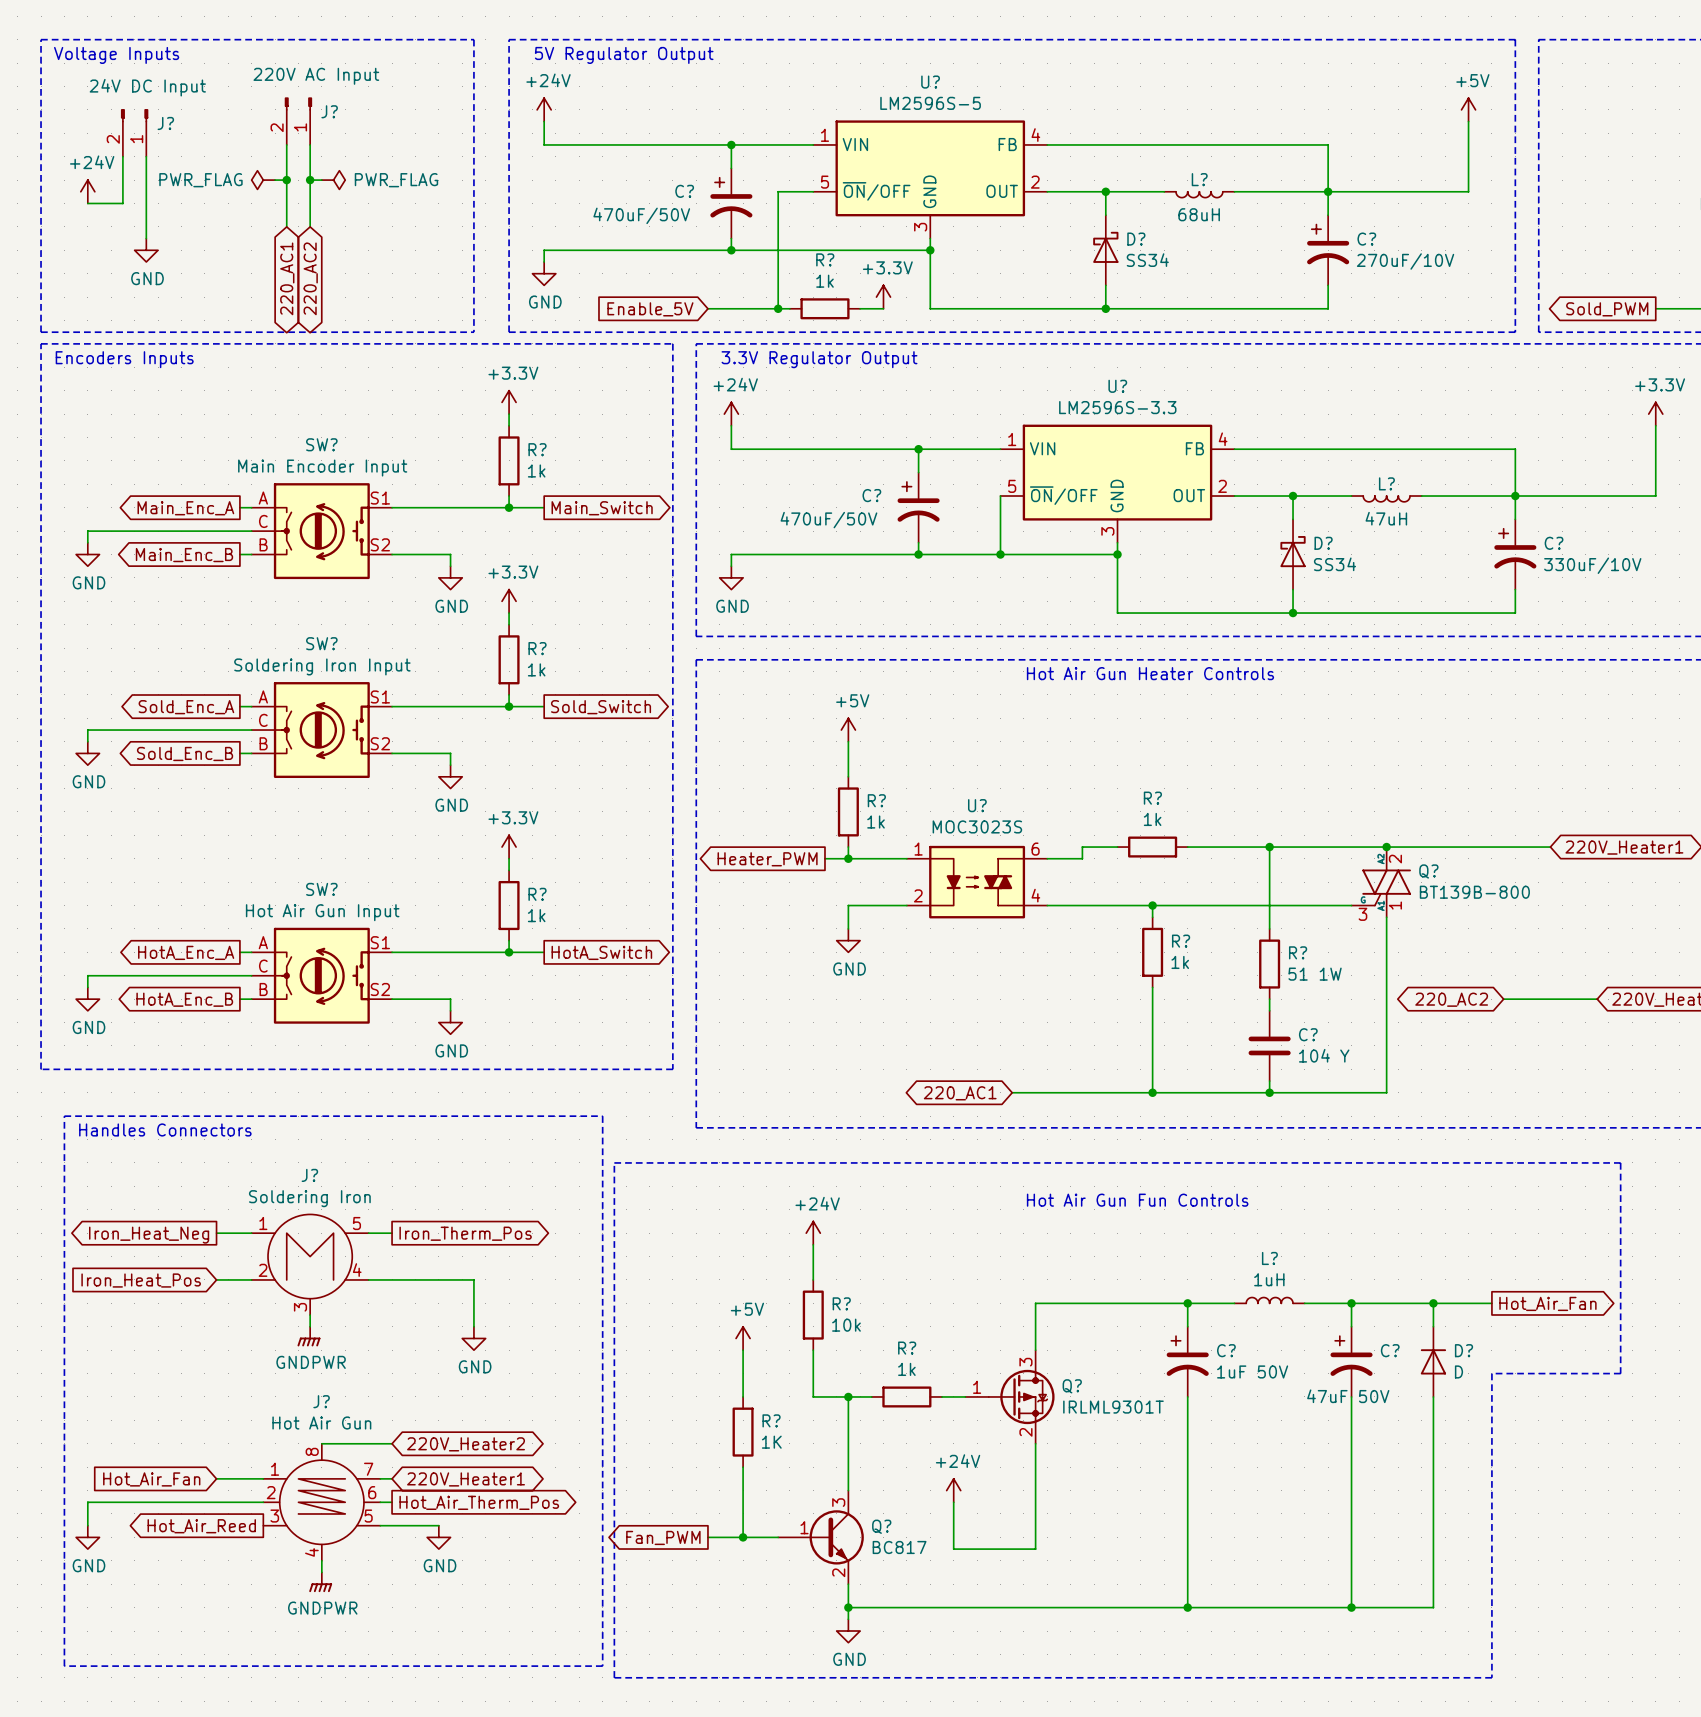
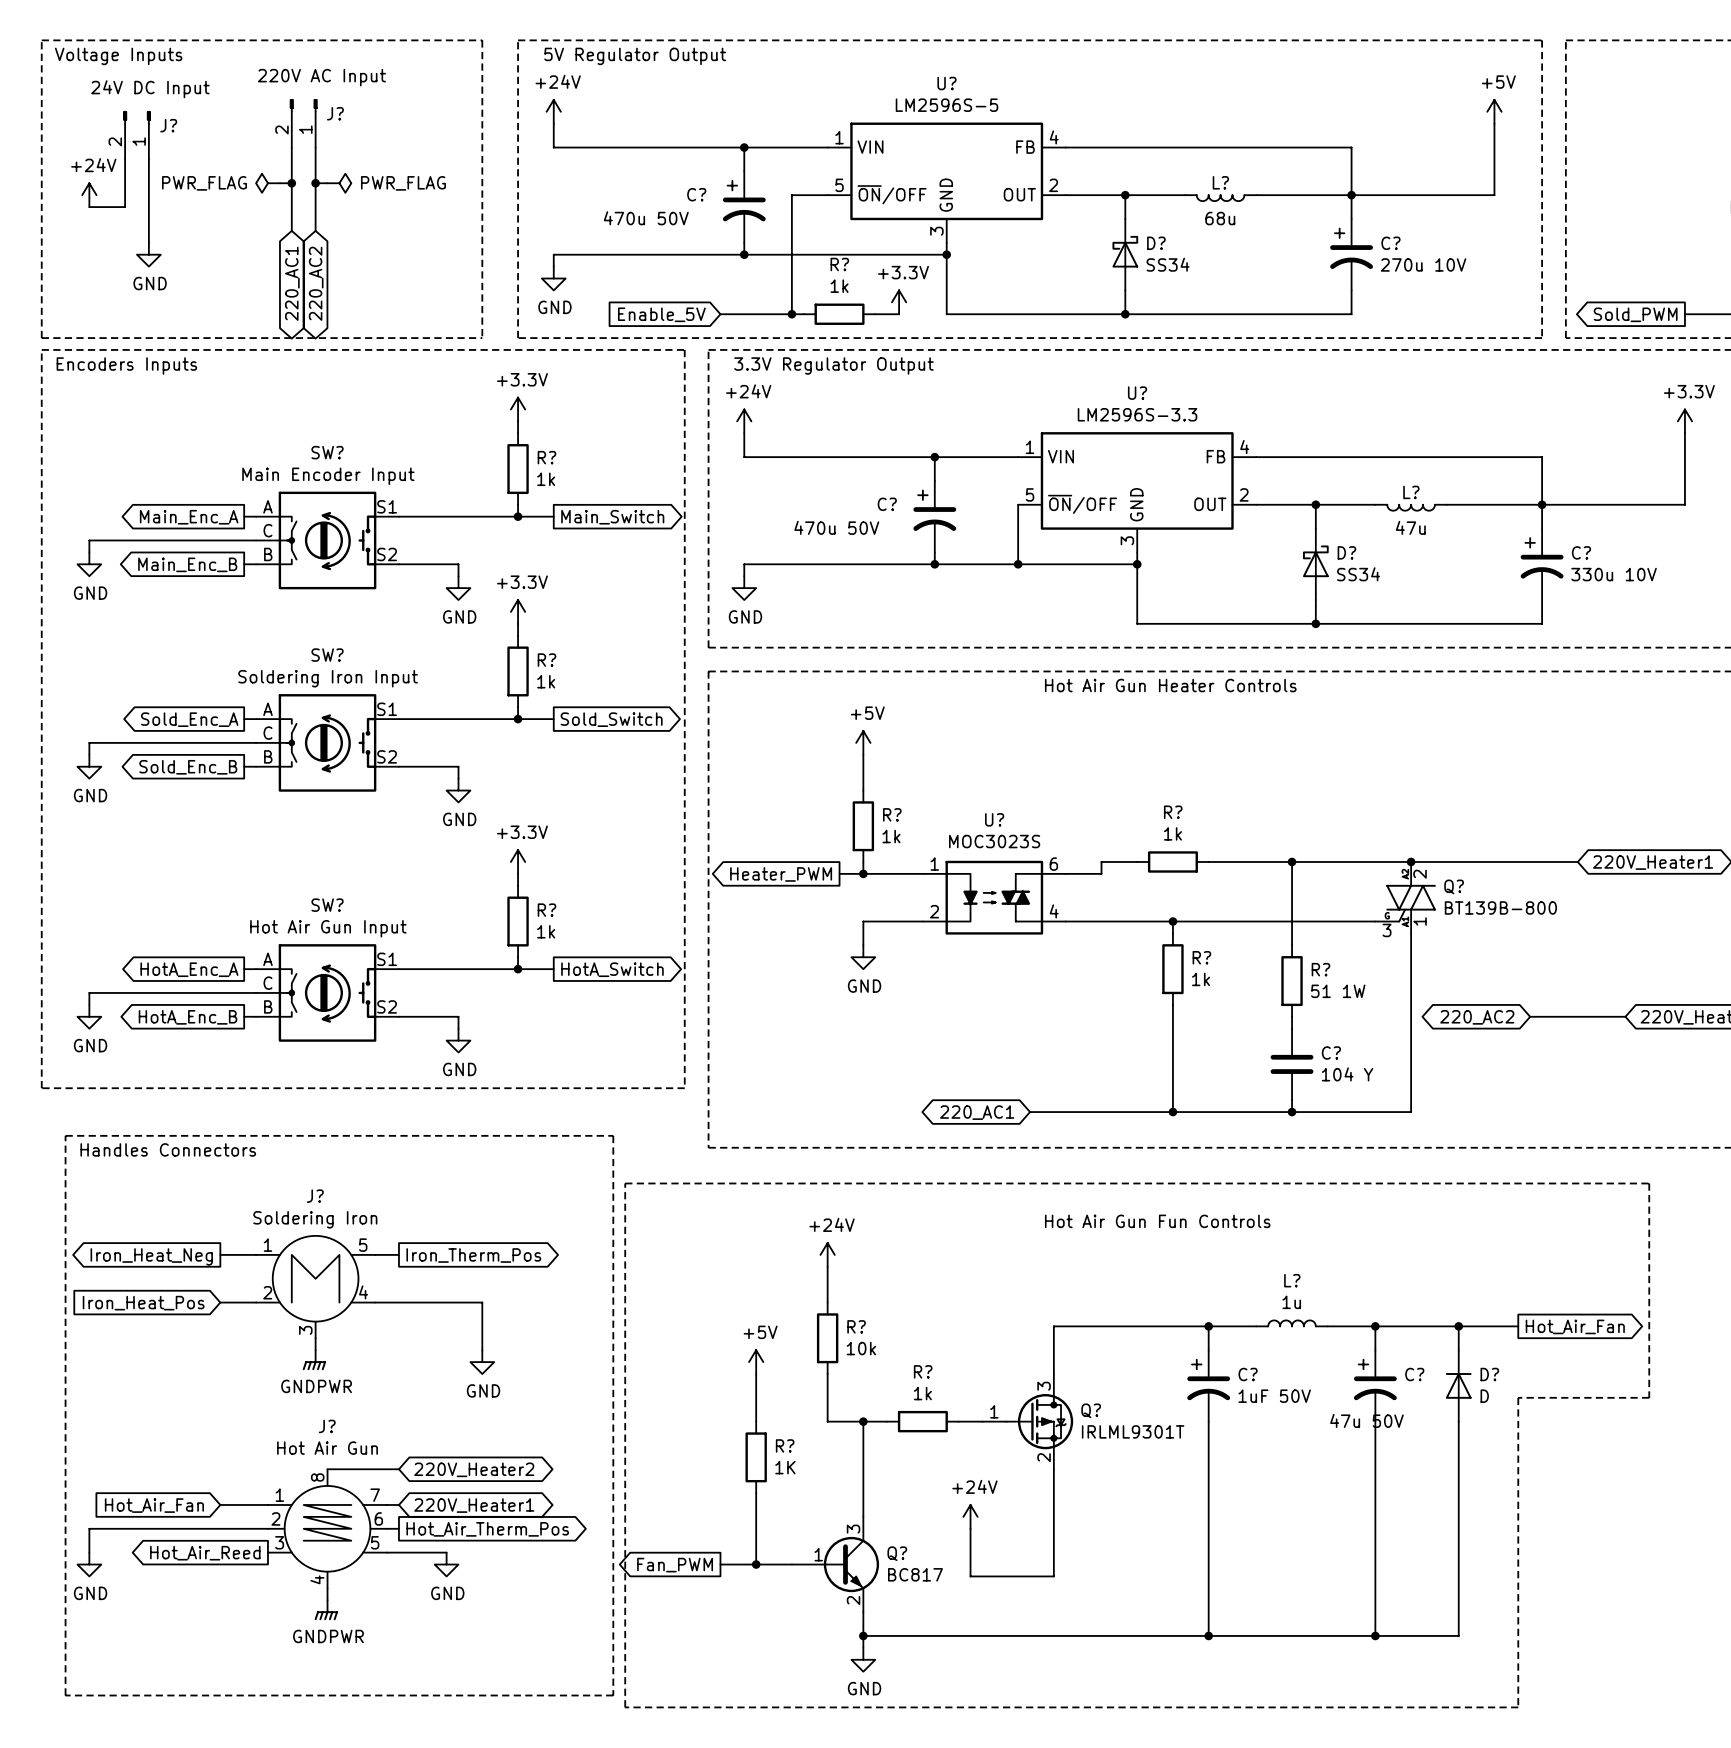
L? value: 68uH (1199, 214) -> 68u (1220, 218)
C? value: 470uF/50V (641, 215) -> 470u 50V (646, 218)
C? value: 270uF/10V (1405, 261) -> 270u 10V (1423, 264)
L? value: 47uH (1386, 518) -> 47u (1410, 527)
C? value: 470uF/50V (828, 520) -> 470u 50V (836, 527)
C? value: 330uF/10V (1592, 565) -> 330u 10V (1614, 574)
L? value: 1uH (1269, 1279) -> 1u (1291, 1302)
C? value: 47uF 50V (1348, 1396) -> 47u 50V (1366, 1420)

